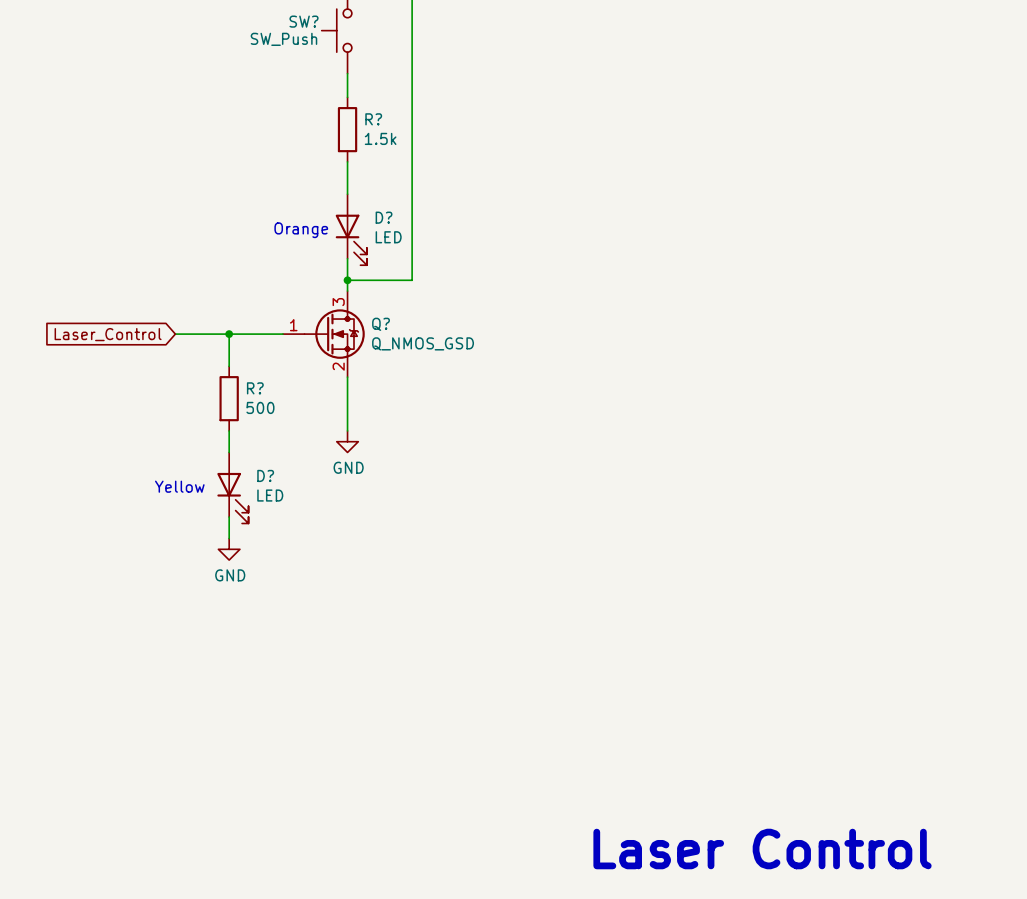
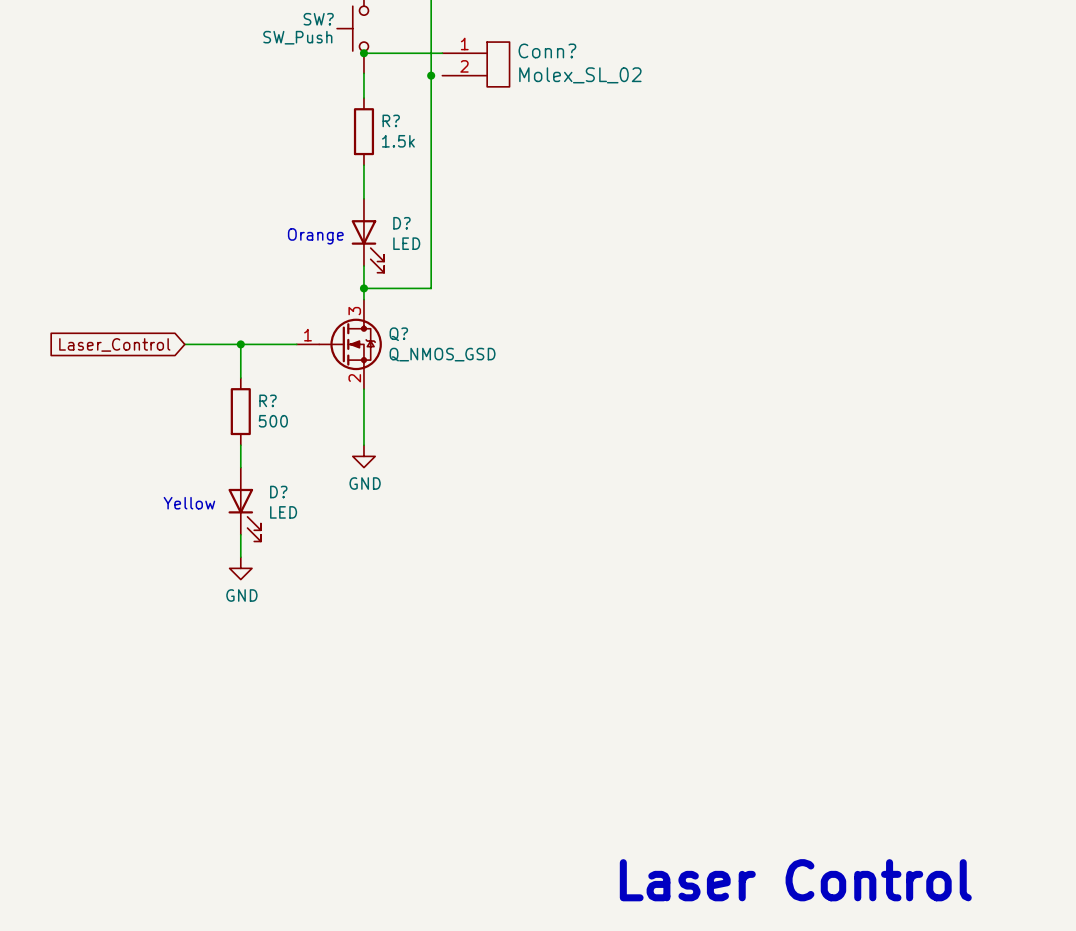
wire: none -> (363, 53) (442, 53)
junction: none -> (363, 53)
Conn?: none -> Molex_SL_02 (475, 64)
junction: none -> (431, 75)

